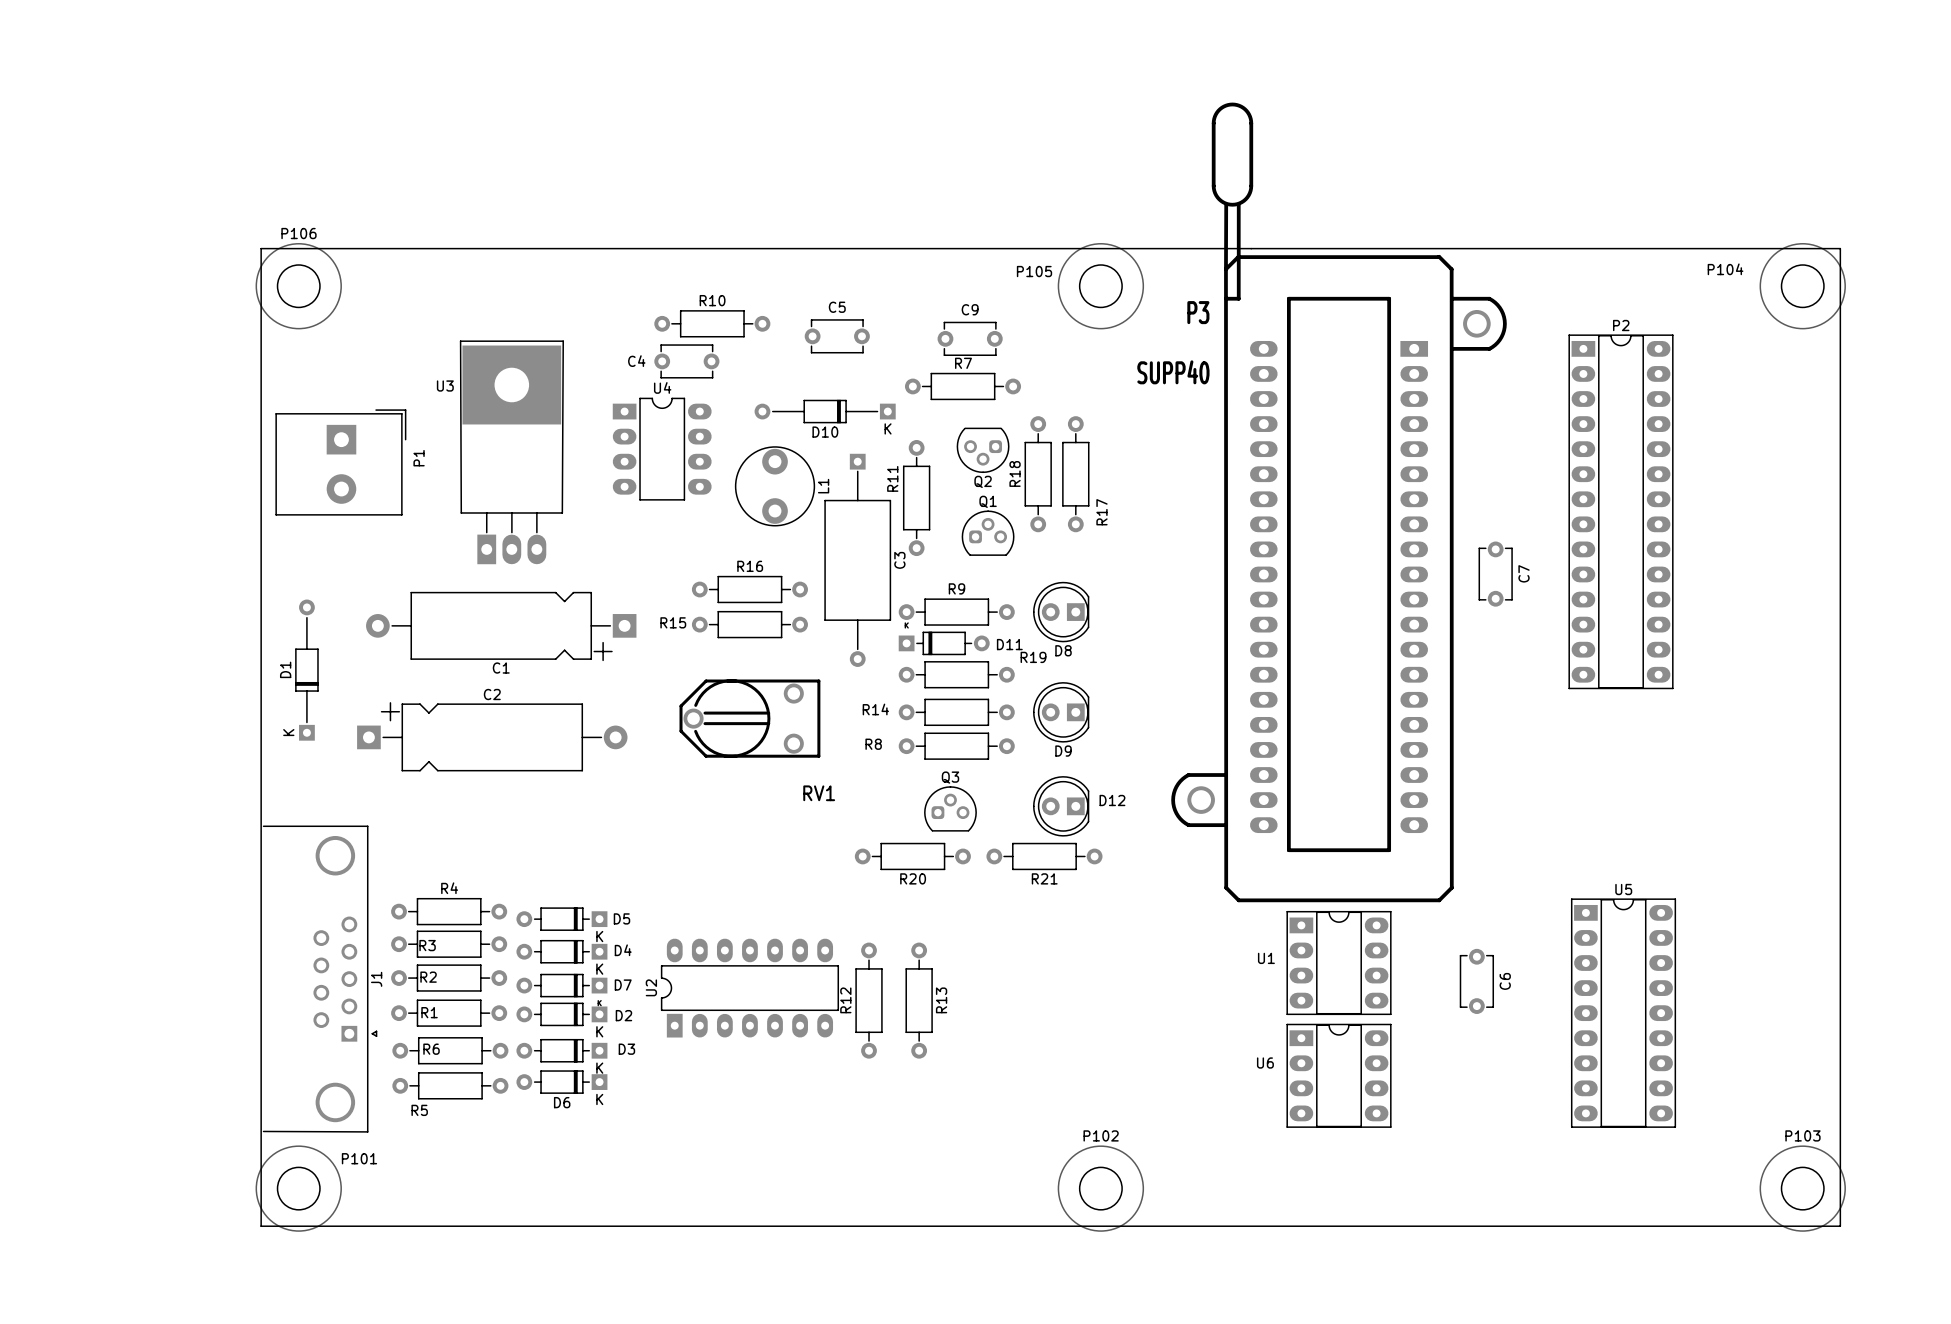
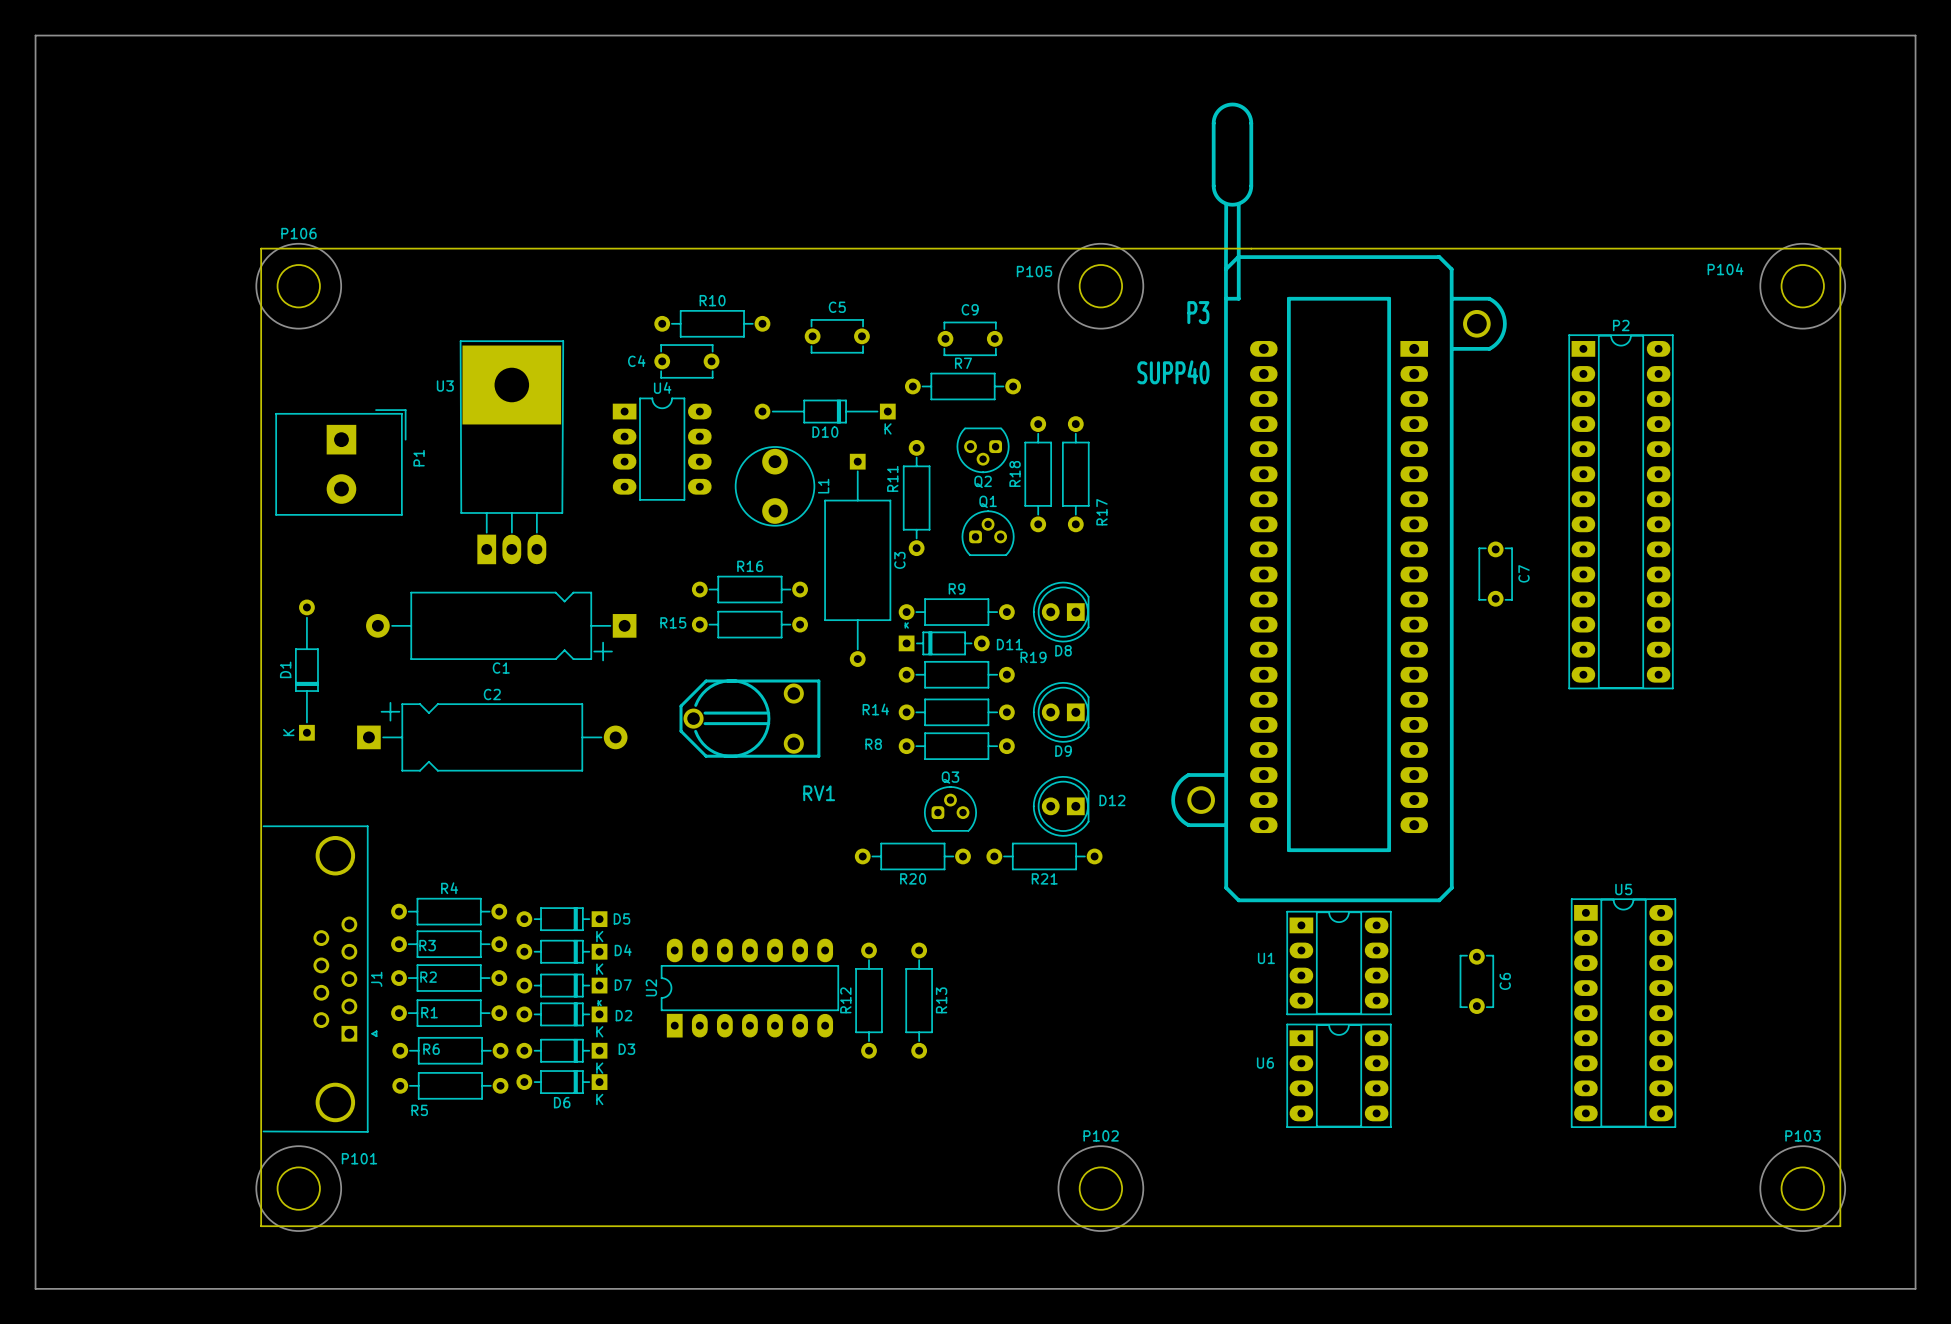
line: none -> (35, 35) (35, 1288) (1915, 1288) (1915, 35) (35, 35)

